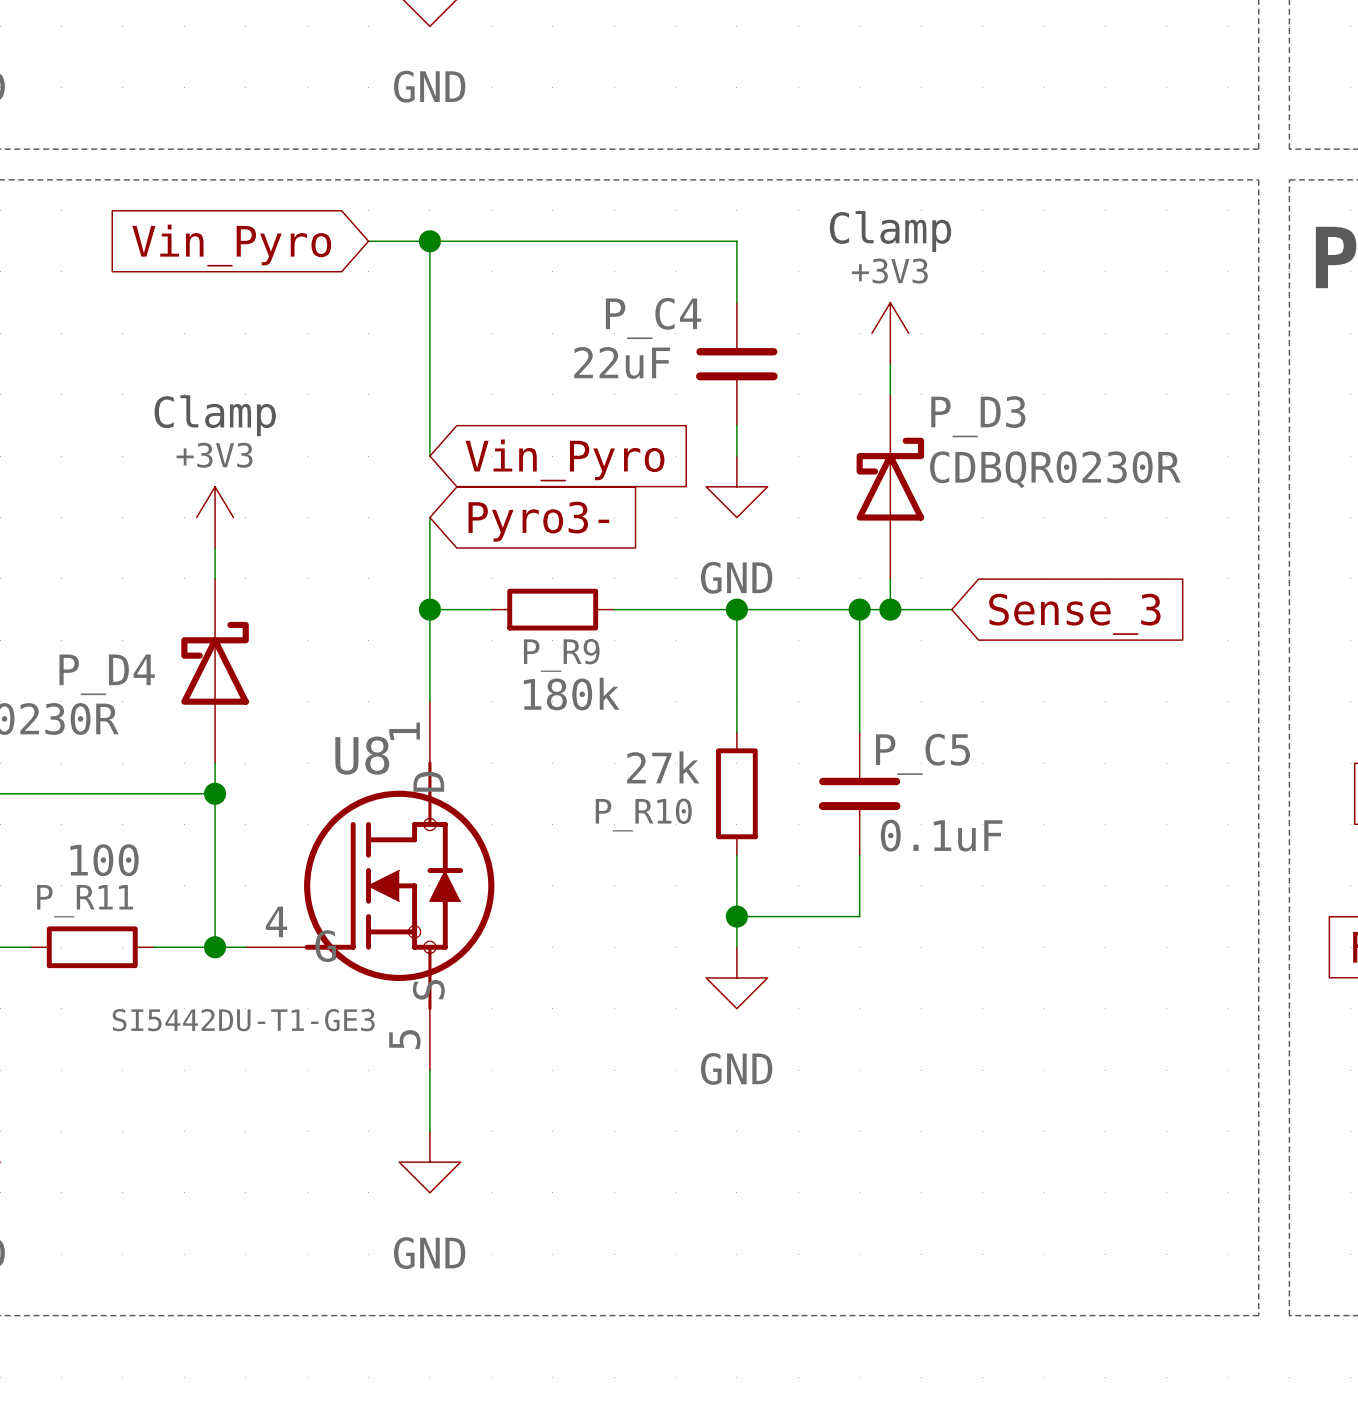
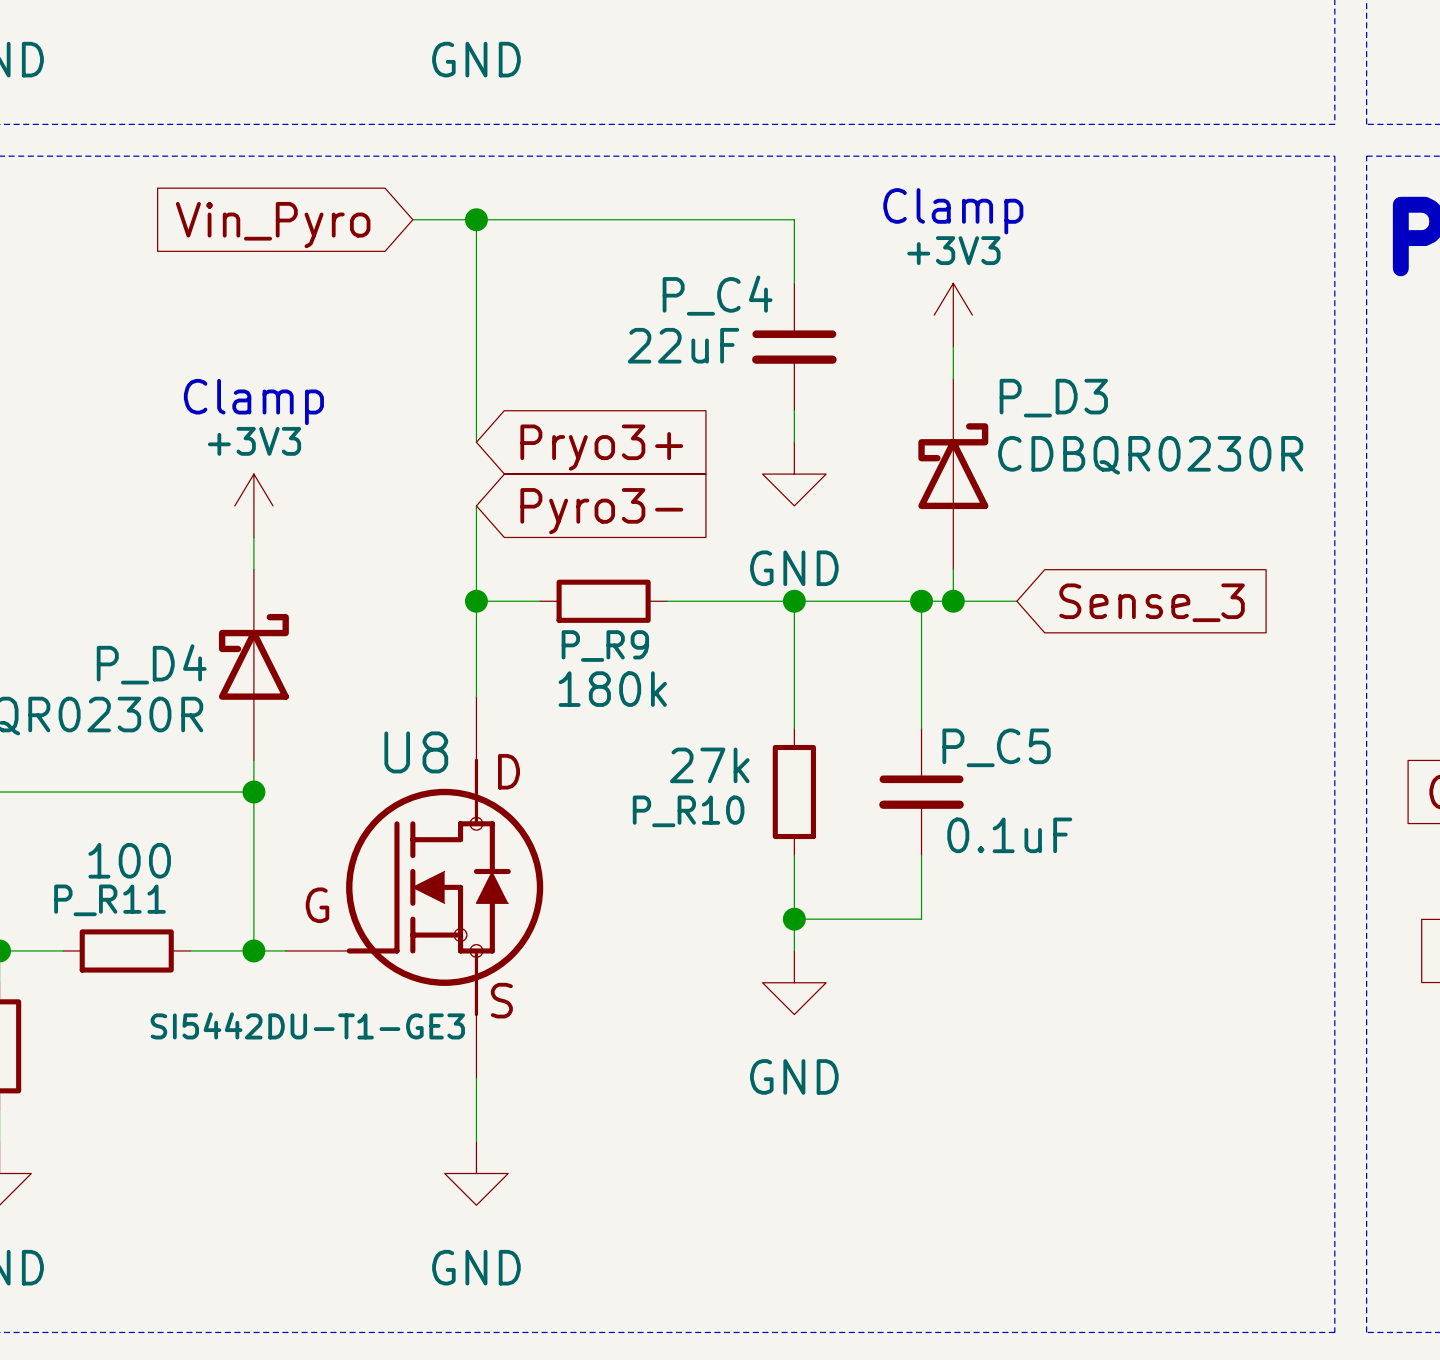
global label: Vin_Pyro (565, 460) -> Pryo3+ (601, 447)
U8 symbol: [245, 701, 495, 1071] -> [285, 696, 544, 1079]

